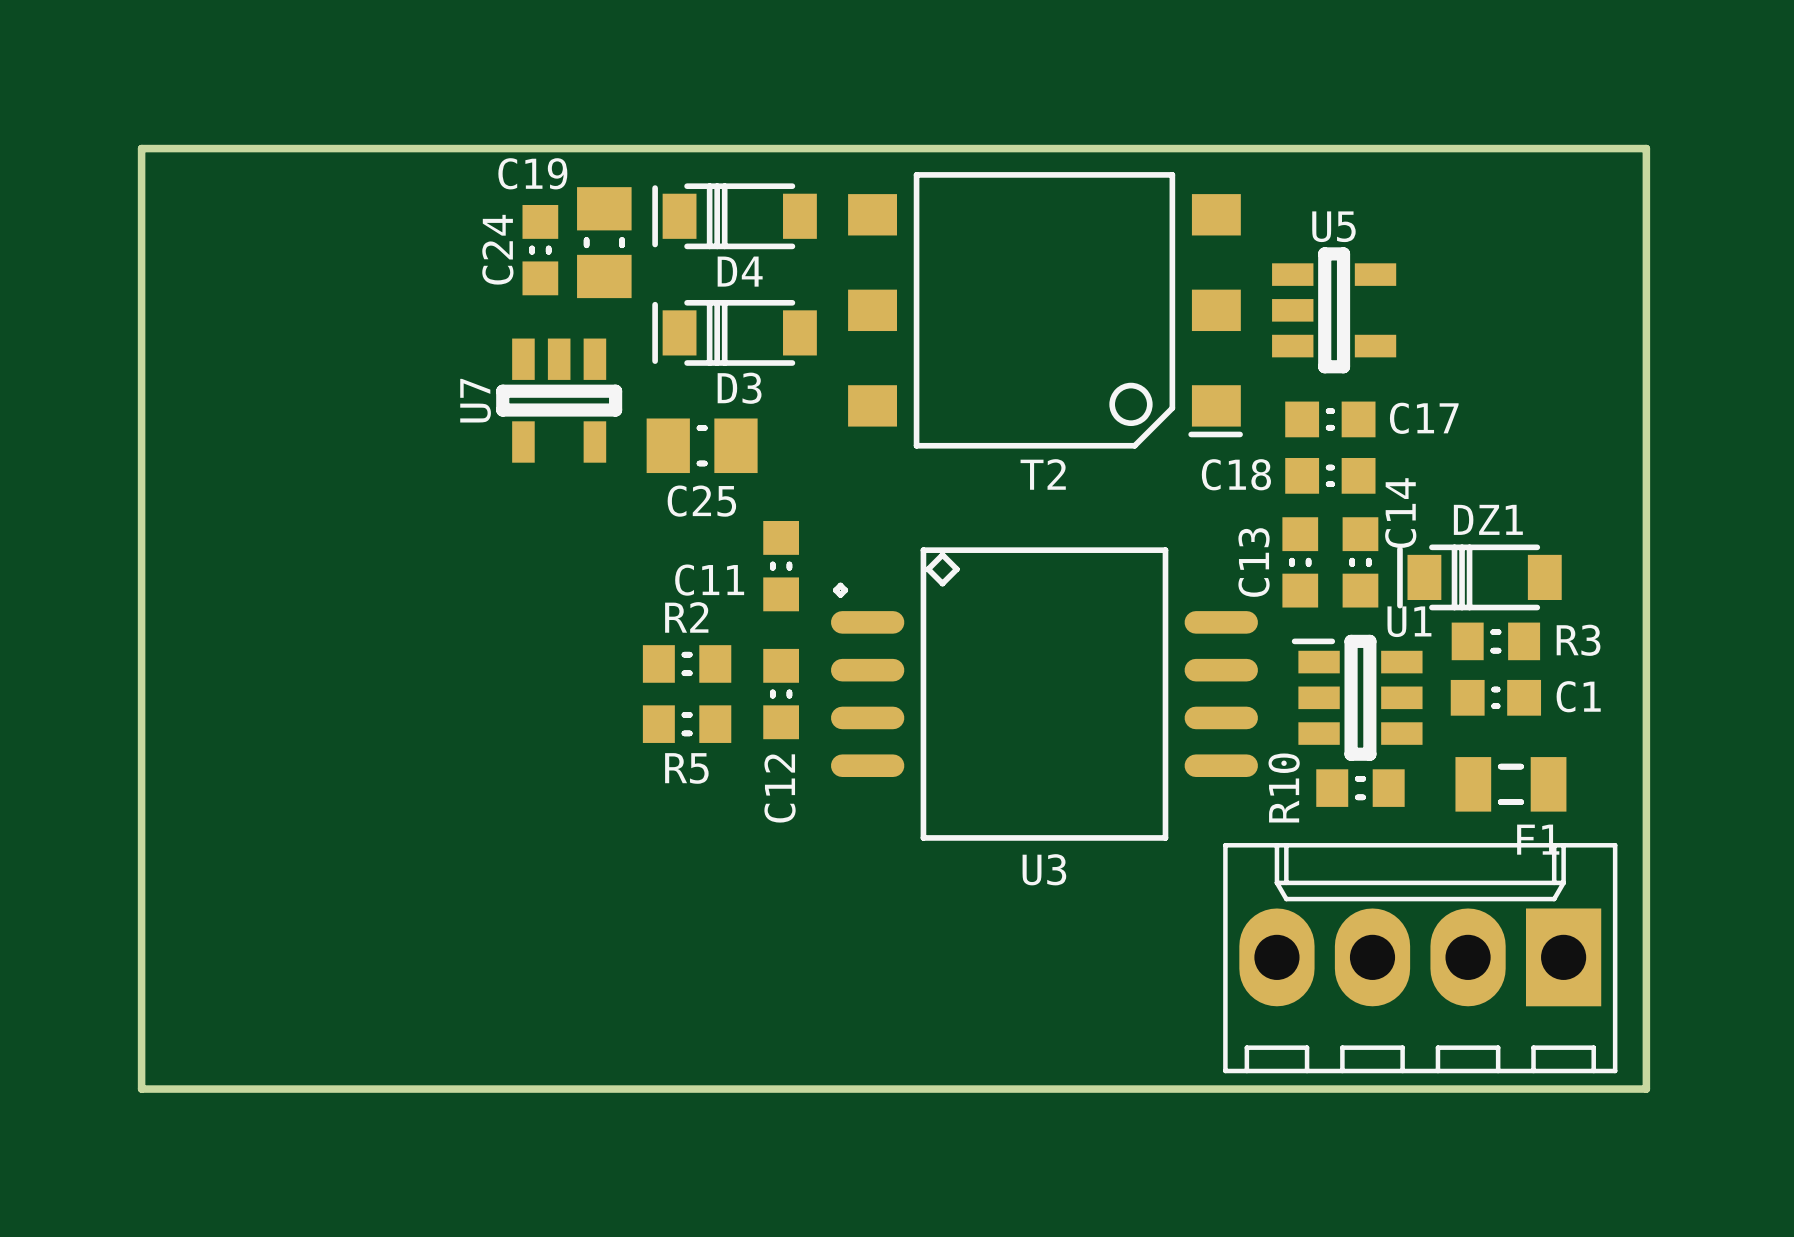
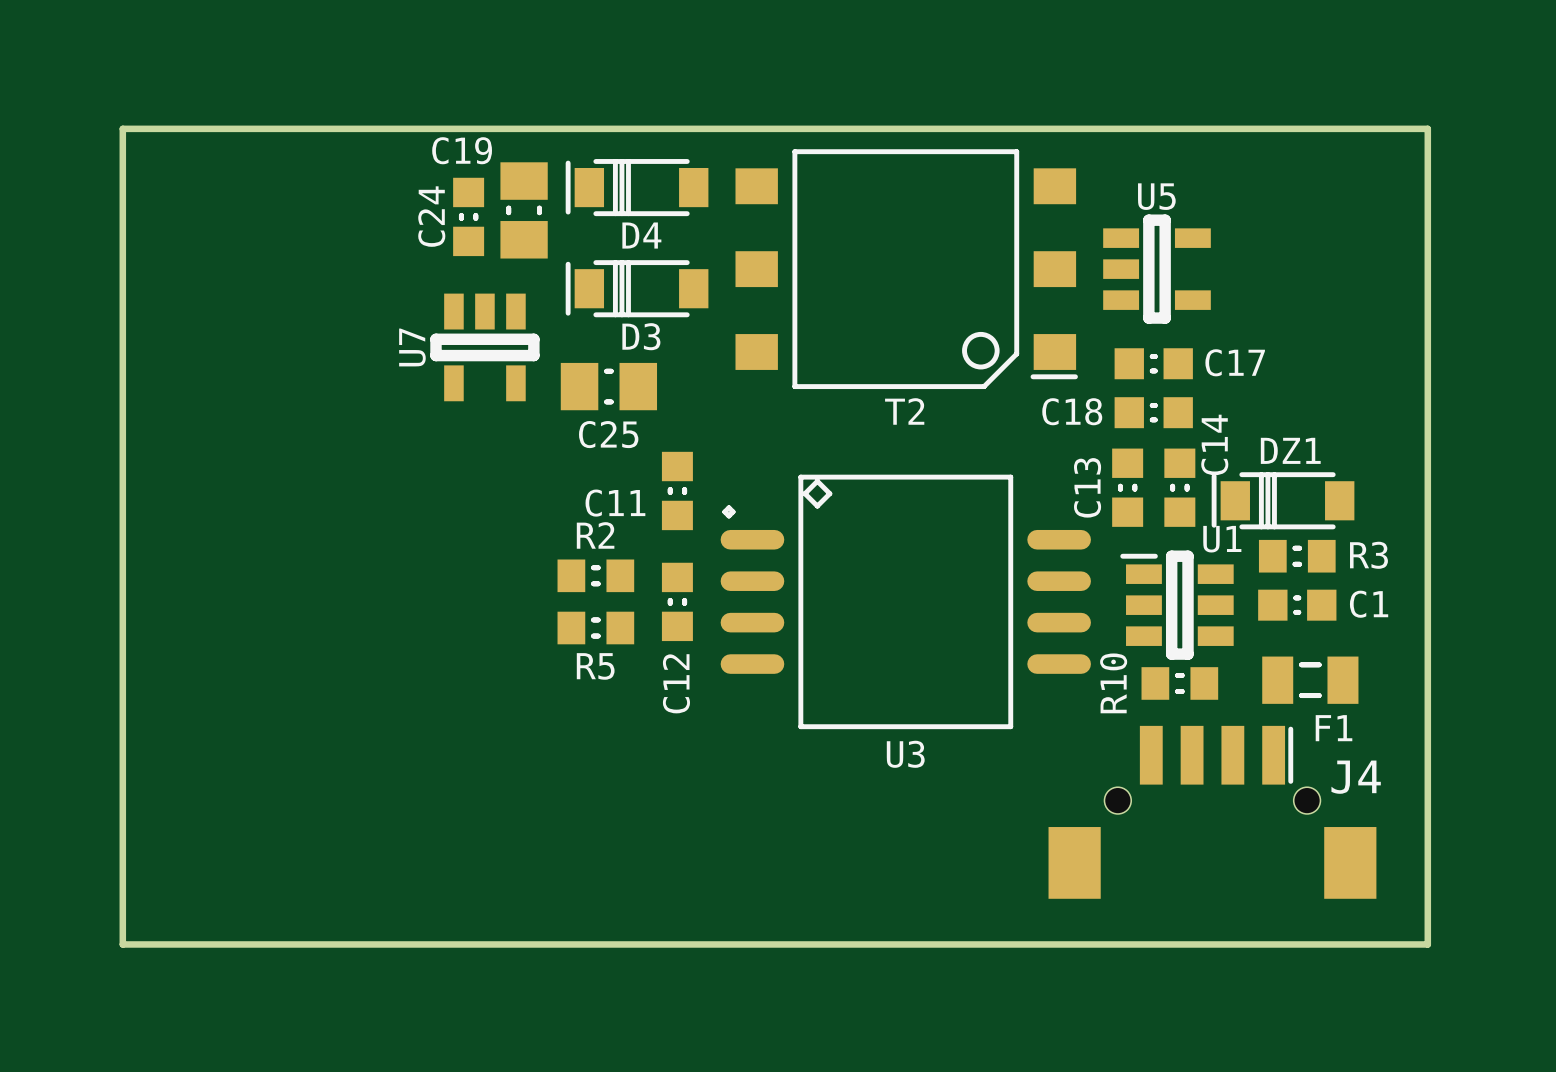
part: (1420, 958) -> none
J4: none -> (1212, 836)

